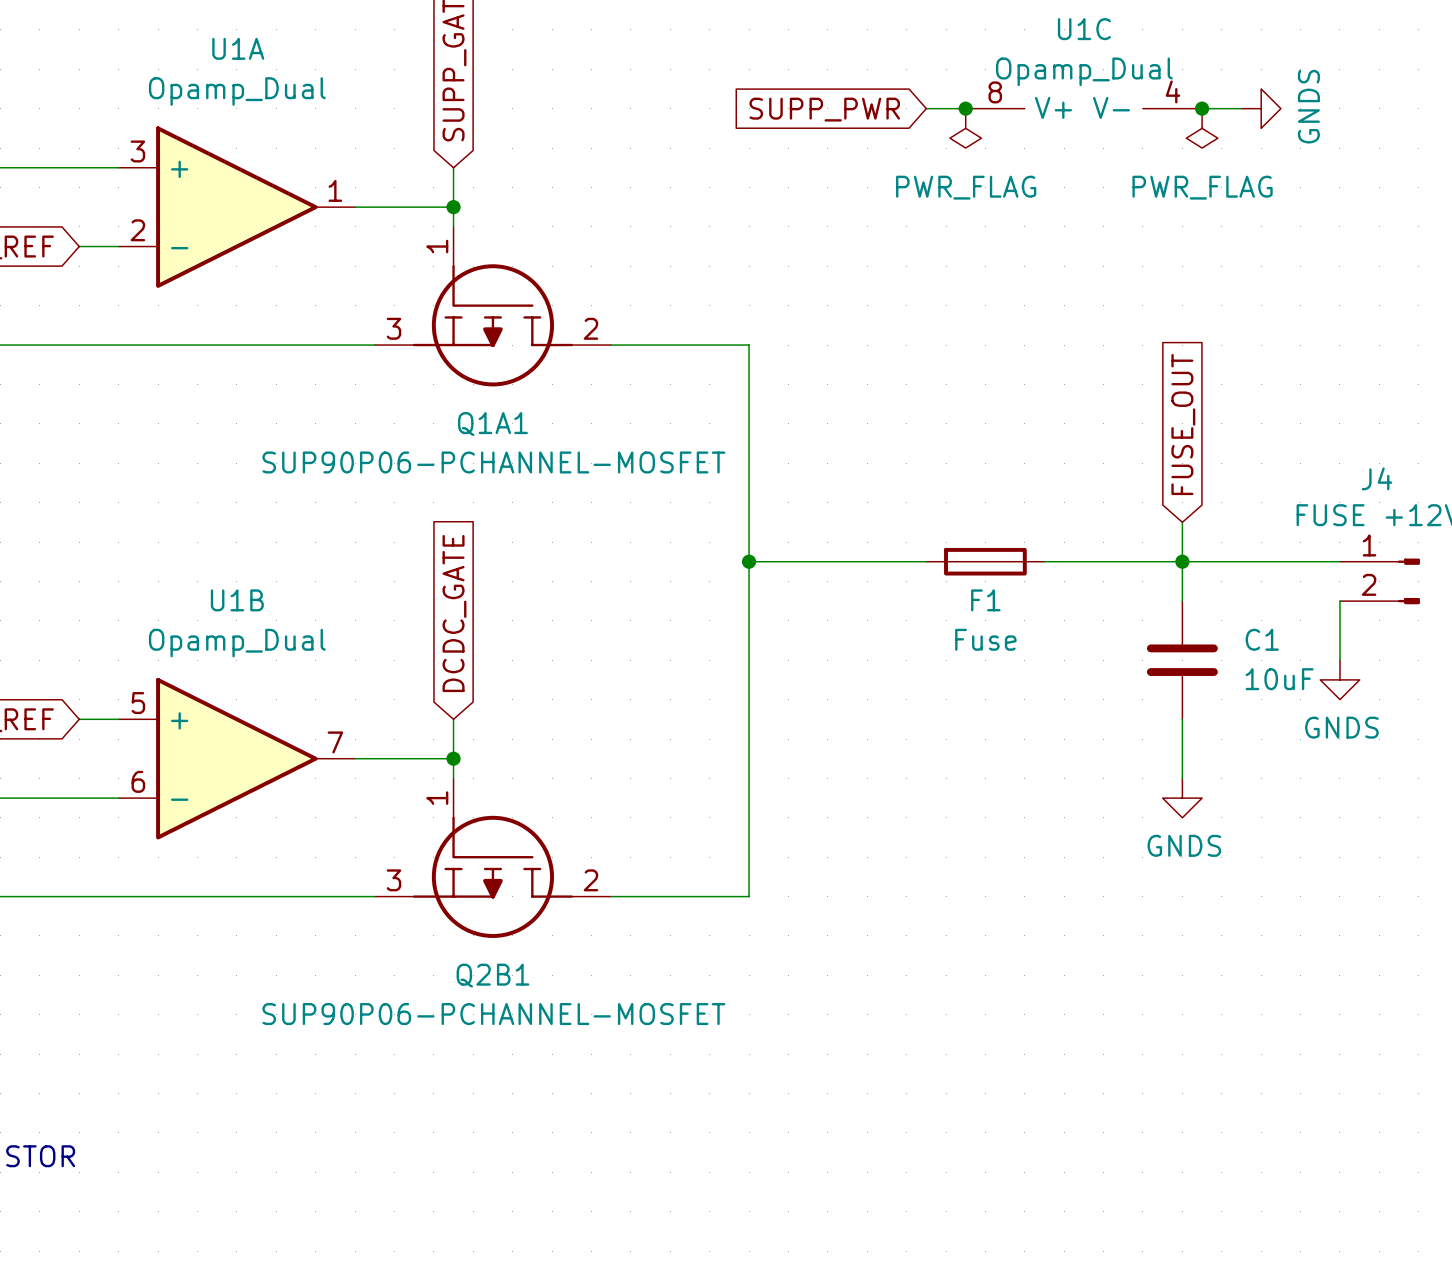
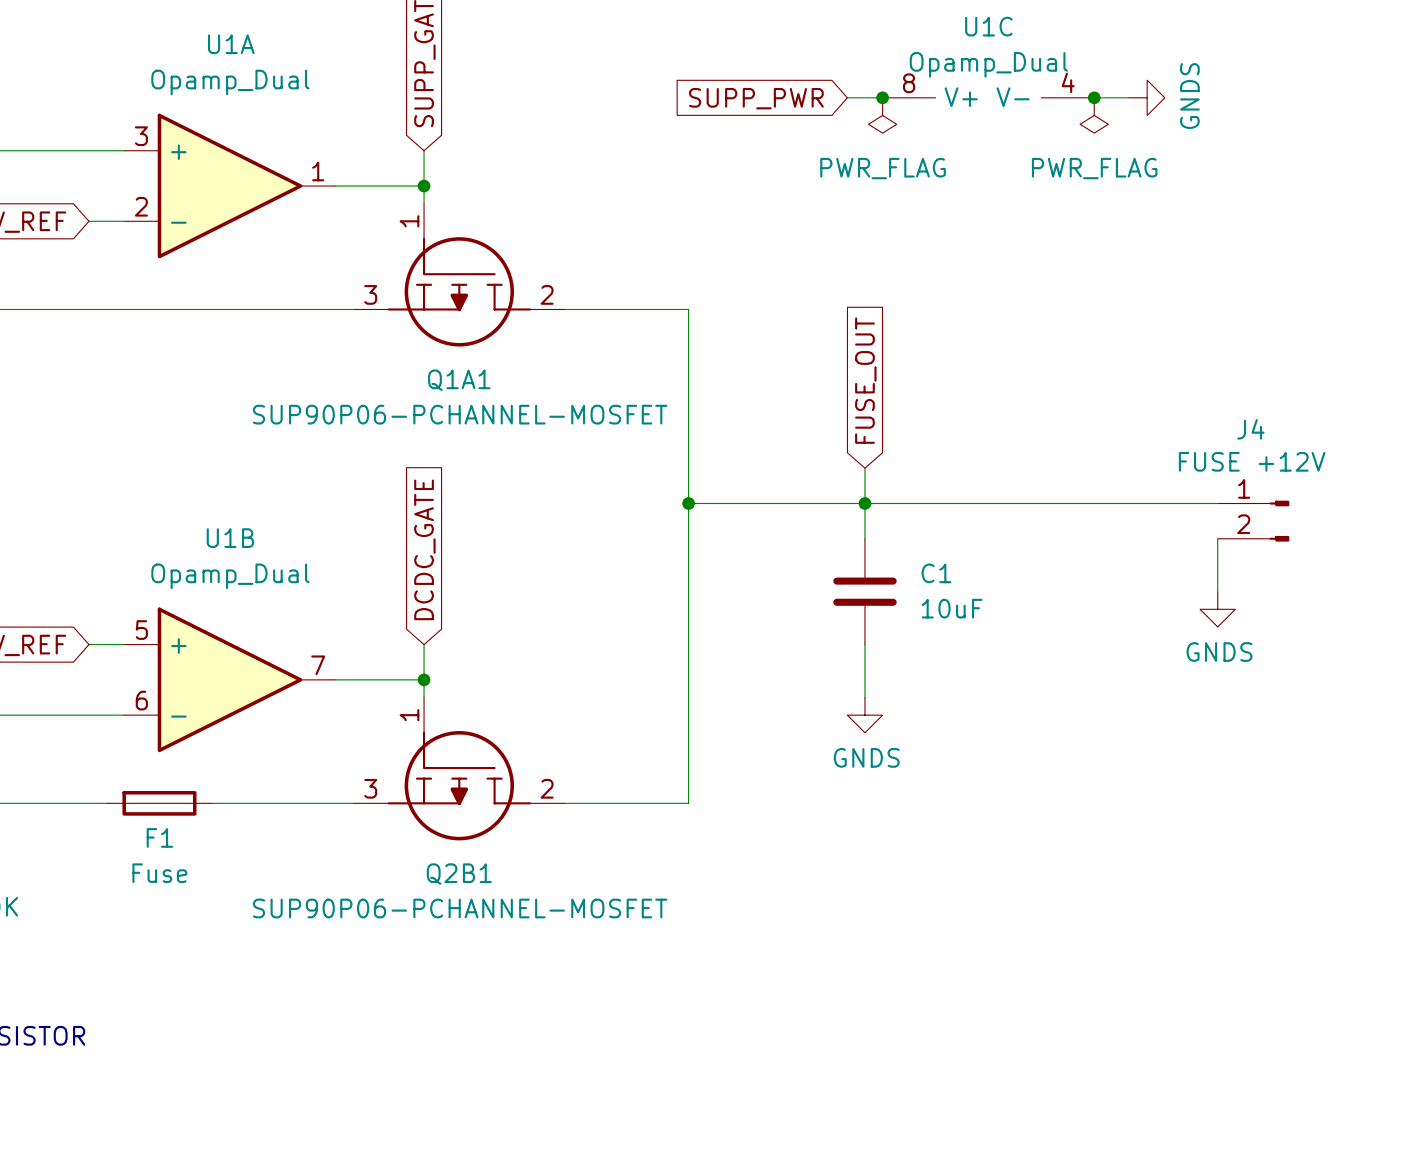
global label position: FUSE_OUT (1183, 424) -> FUSE_OUT (865, 380)
wire: (1182, 522) (1182, 601) -> (864, 468) (864, 538)
junction: none -> (864, 503)
F1 position: (985, 561) -> (159, 803)
junction: (1182, 561) -> none
C1 position: (1182, 660) -> (864, 591)
wire: (1182, 719) (1182, 778) -> (864, 644) (864, 697)
power symbol position: GNDS (1182, 798) -> GNDS (864, 715)

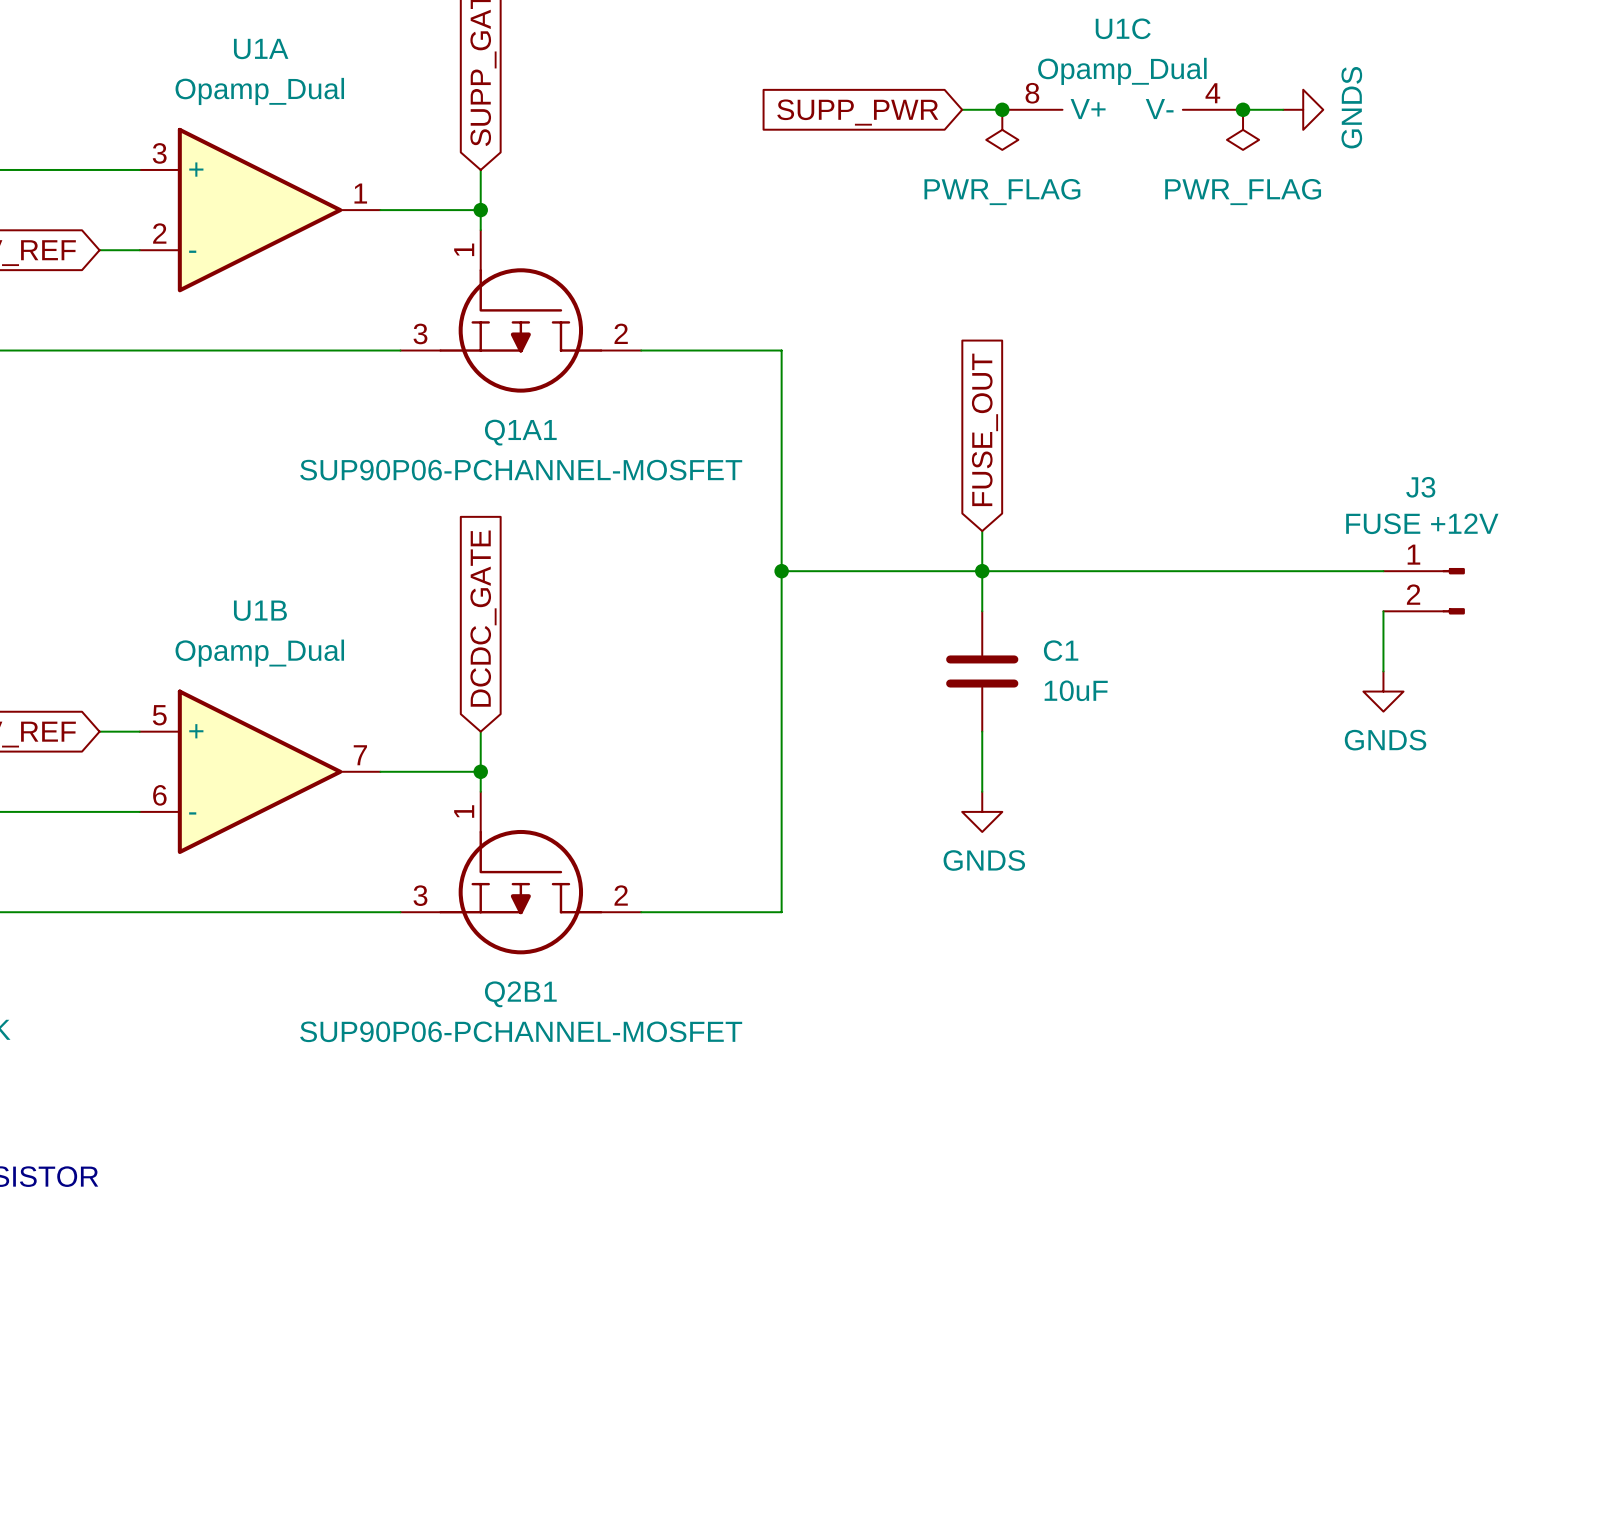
J4 name: J4 (1250, 429) -> J3 (1420, 487)
F1: Fuse (159, 803) -> none

